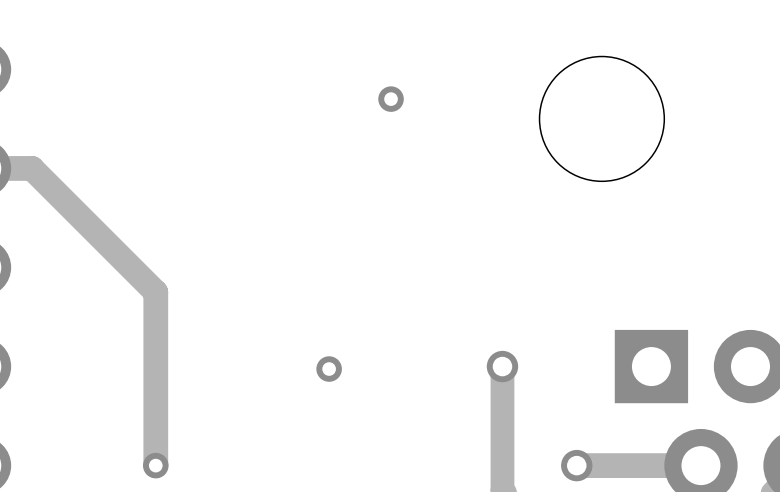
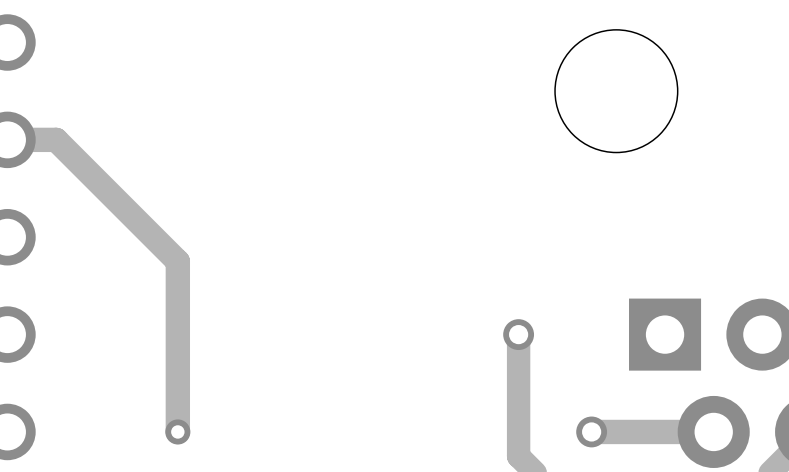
via: (391, 99) -> none
via: (329, 369) -> none

